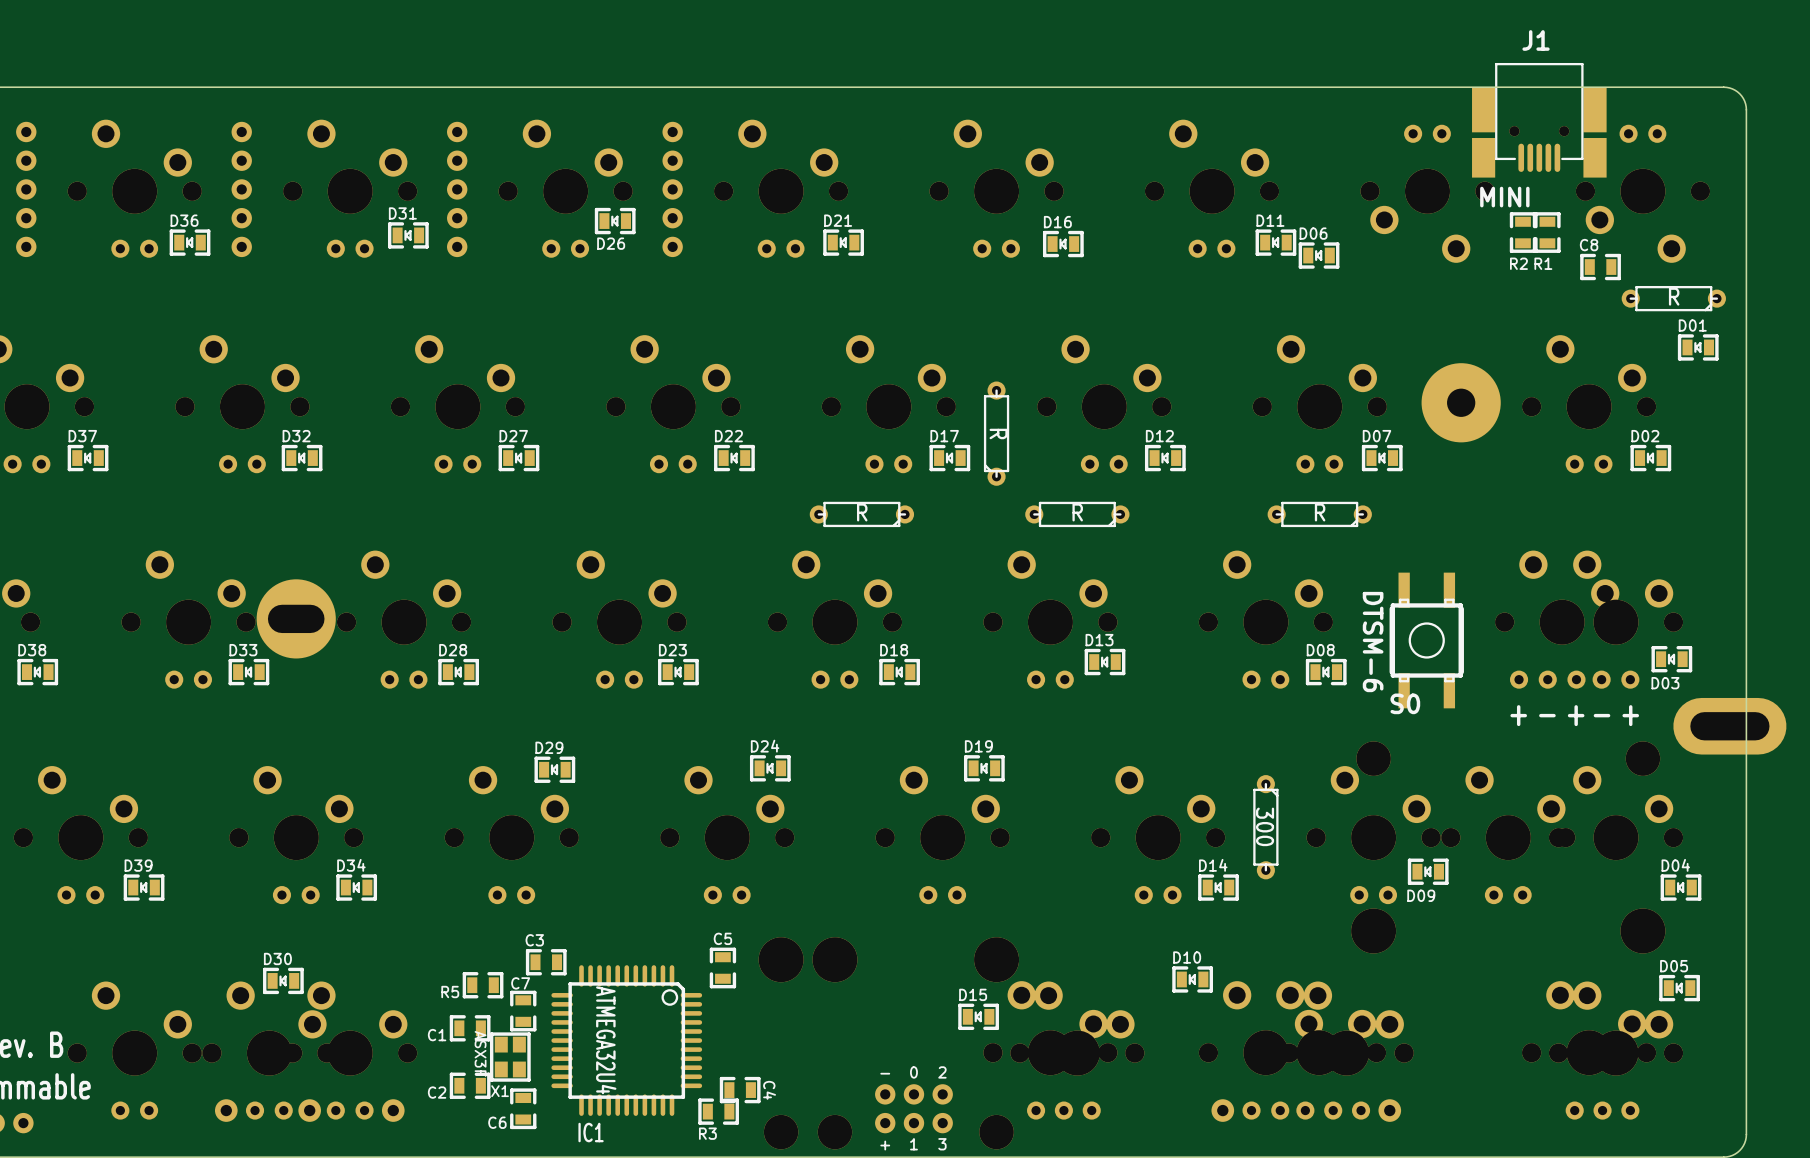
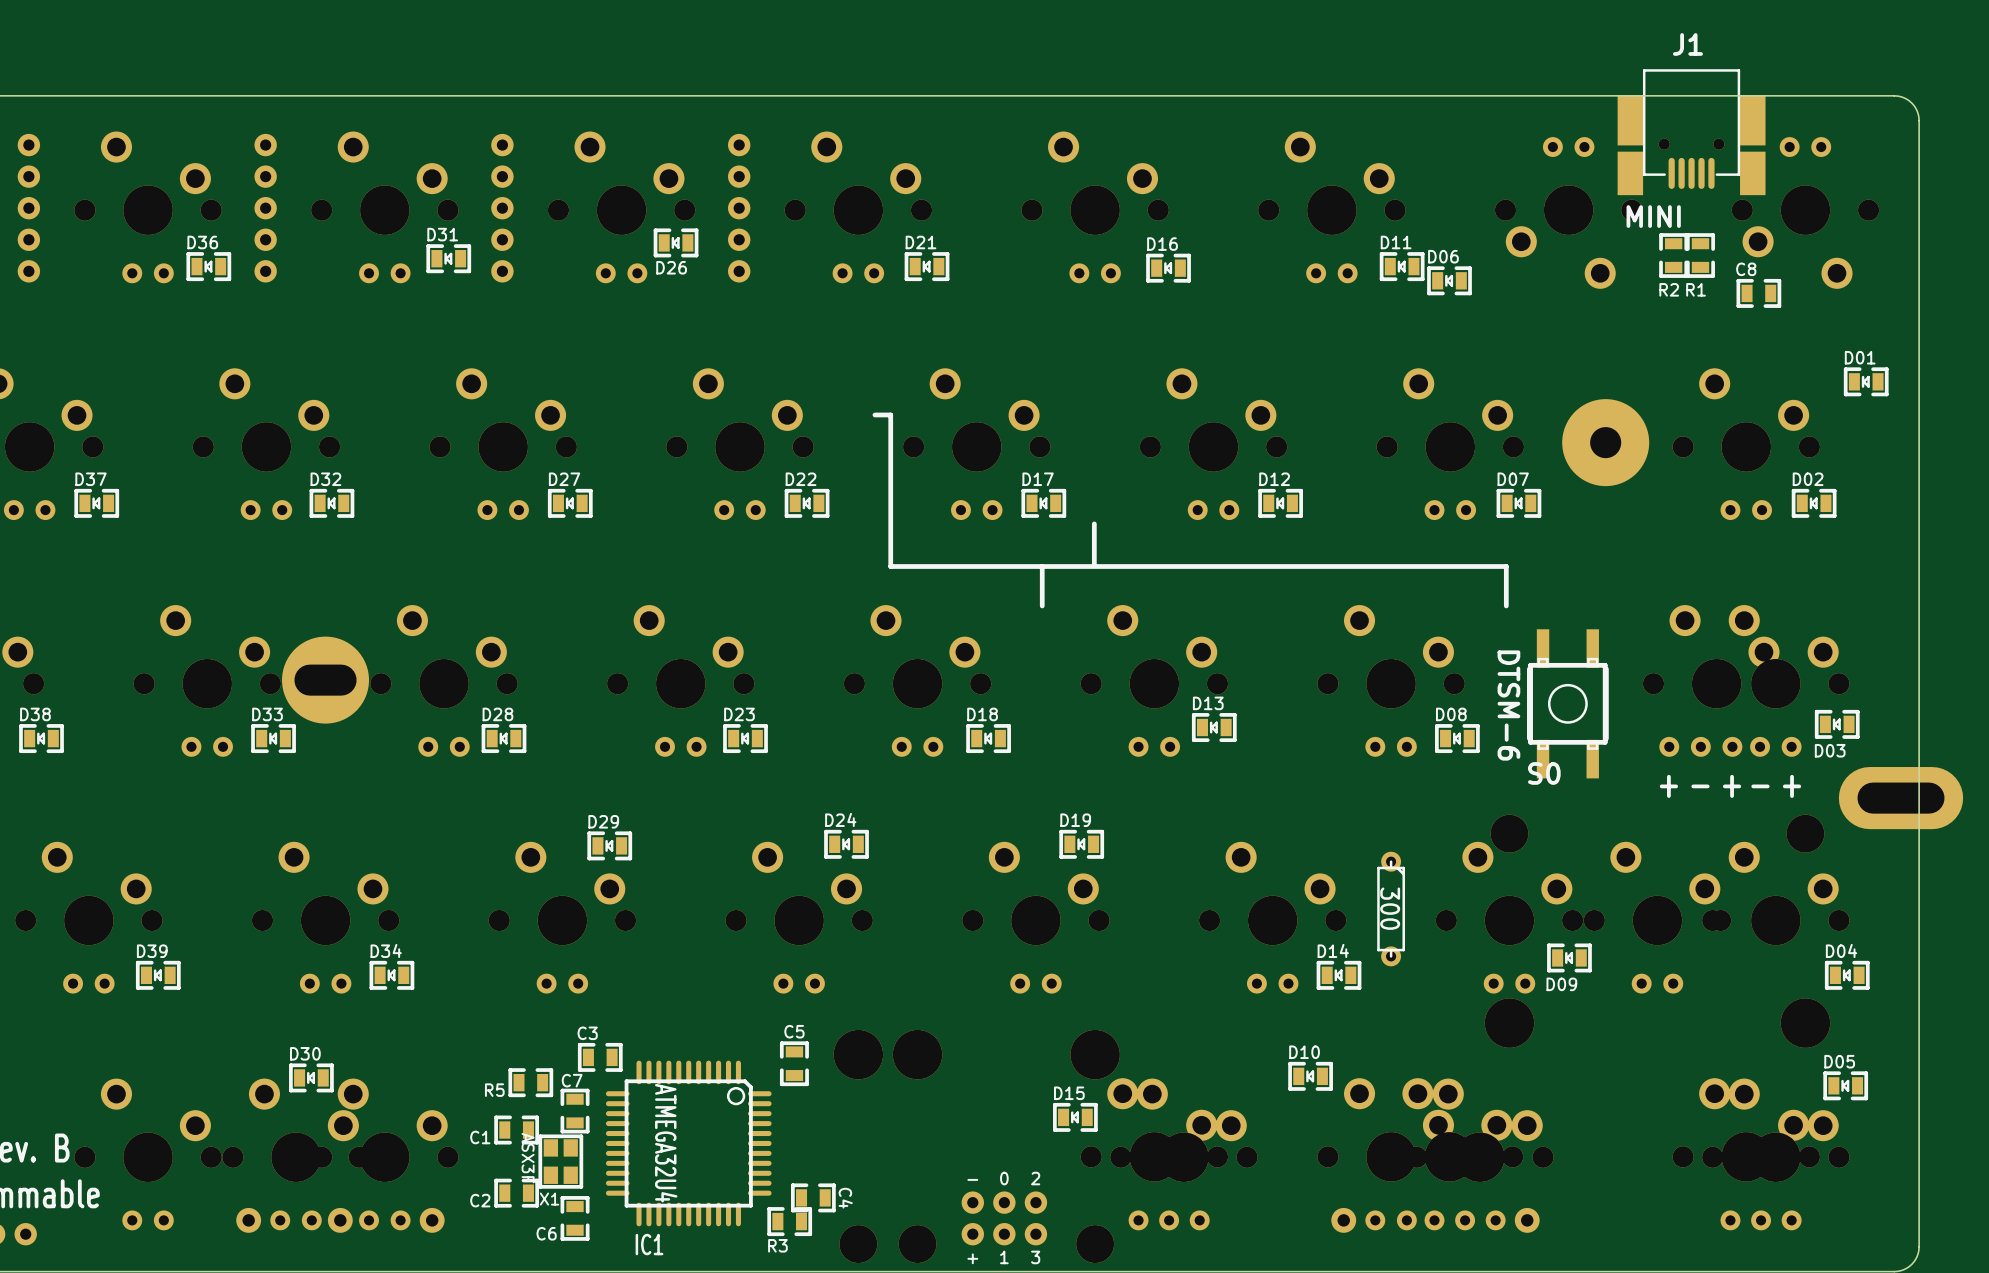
part: R (1673, 298) -> none
line: none -> (874, 414) (890, 414) (890, 566) (1506, 566) (1506, 605)
part: R (996, 433) -> none
line: none -> (1094, 523) (1094, 564)
part: R (861, 514) -> none
part: R (1077, 514) -> none
part: R (1319, 514) -> none
line: none -> (1042, 566) (1042, 605)

